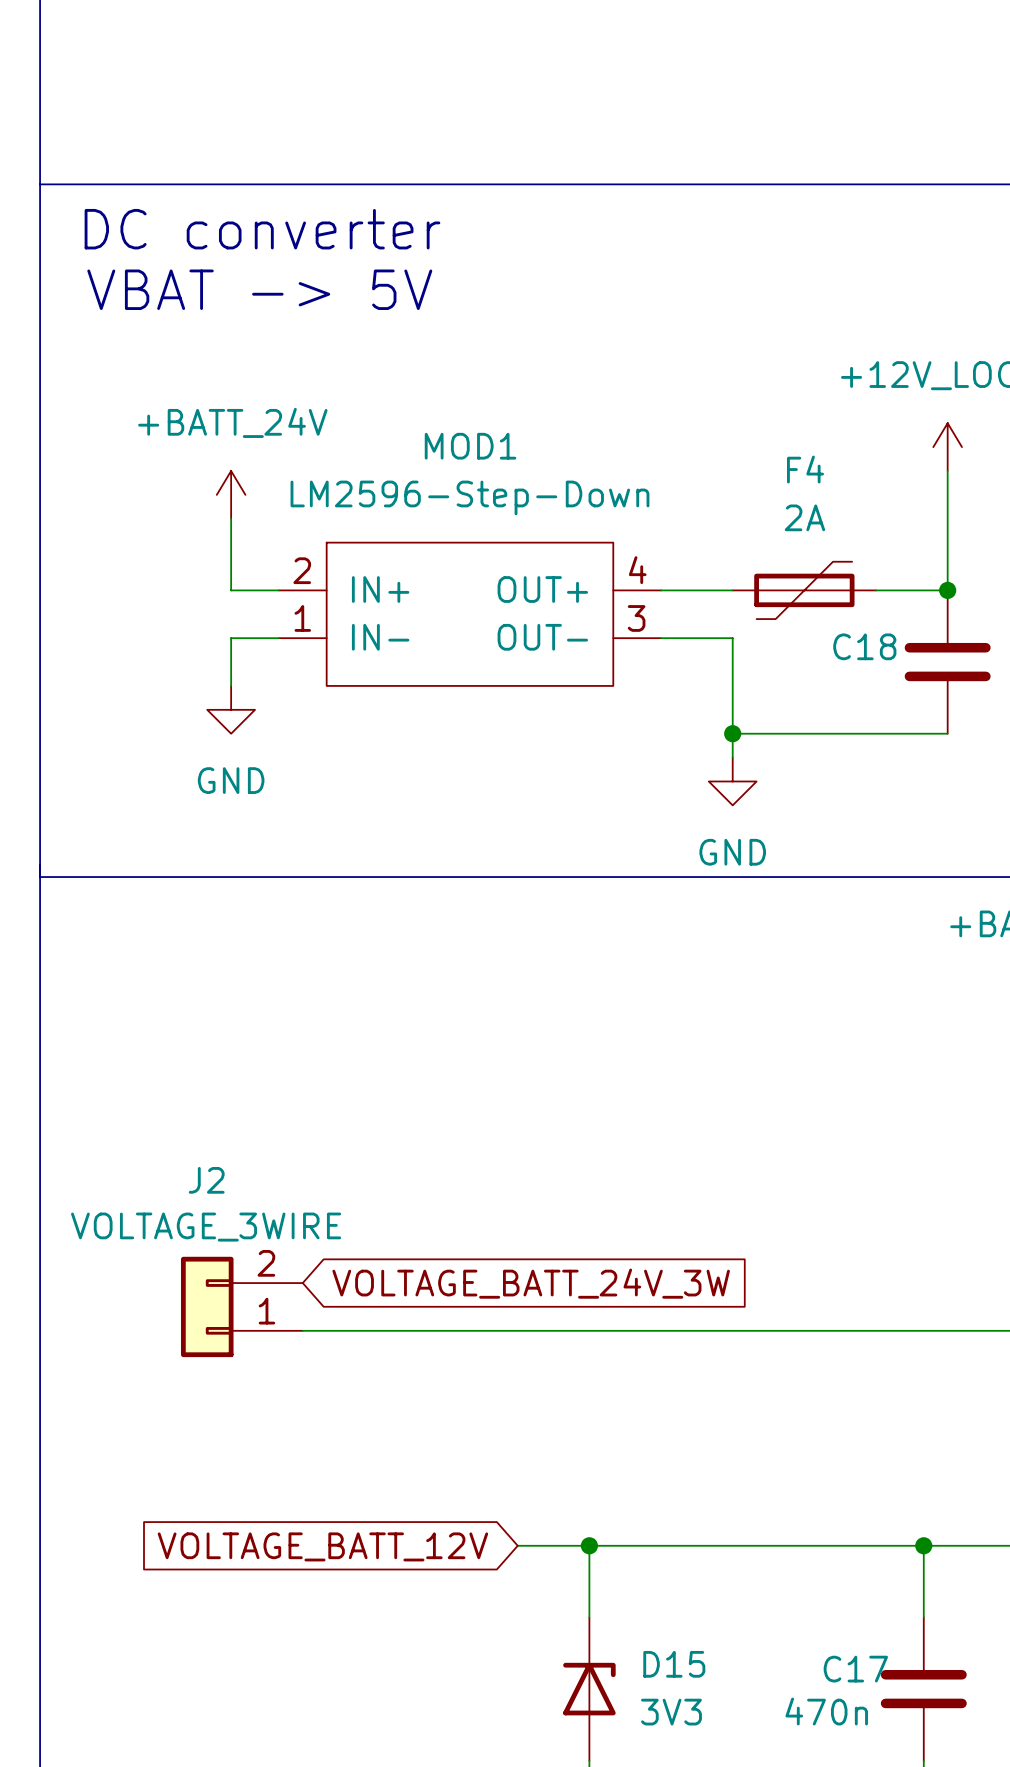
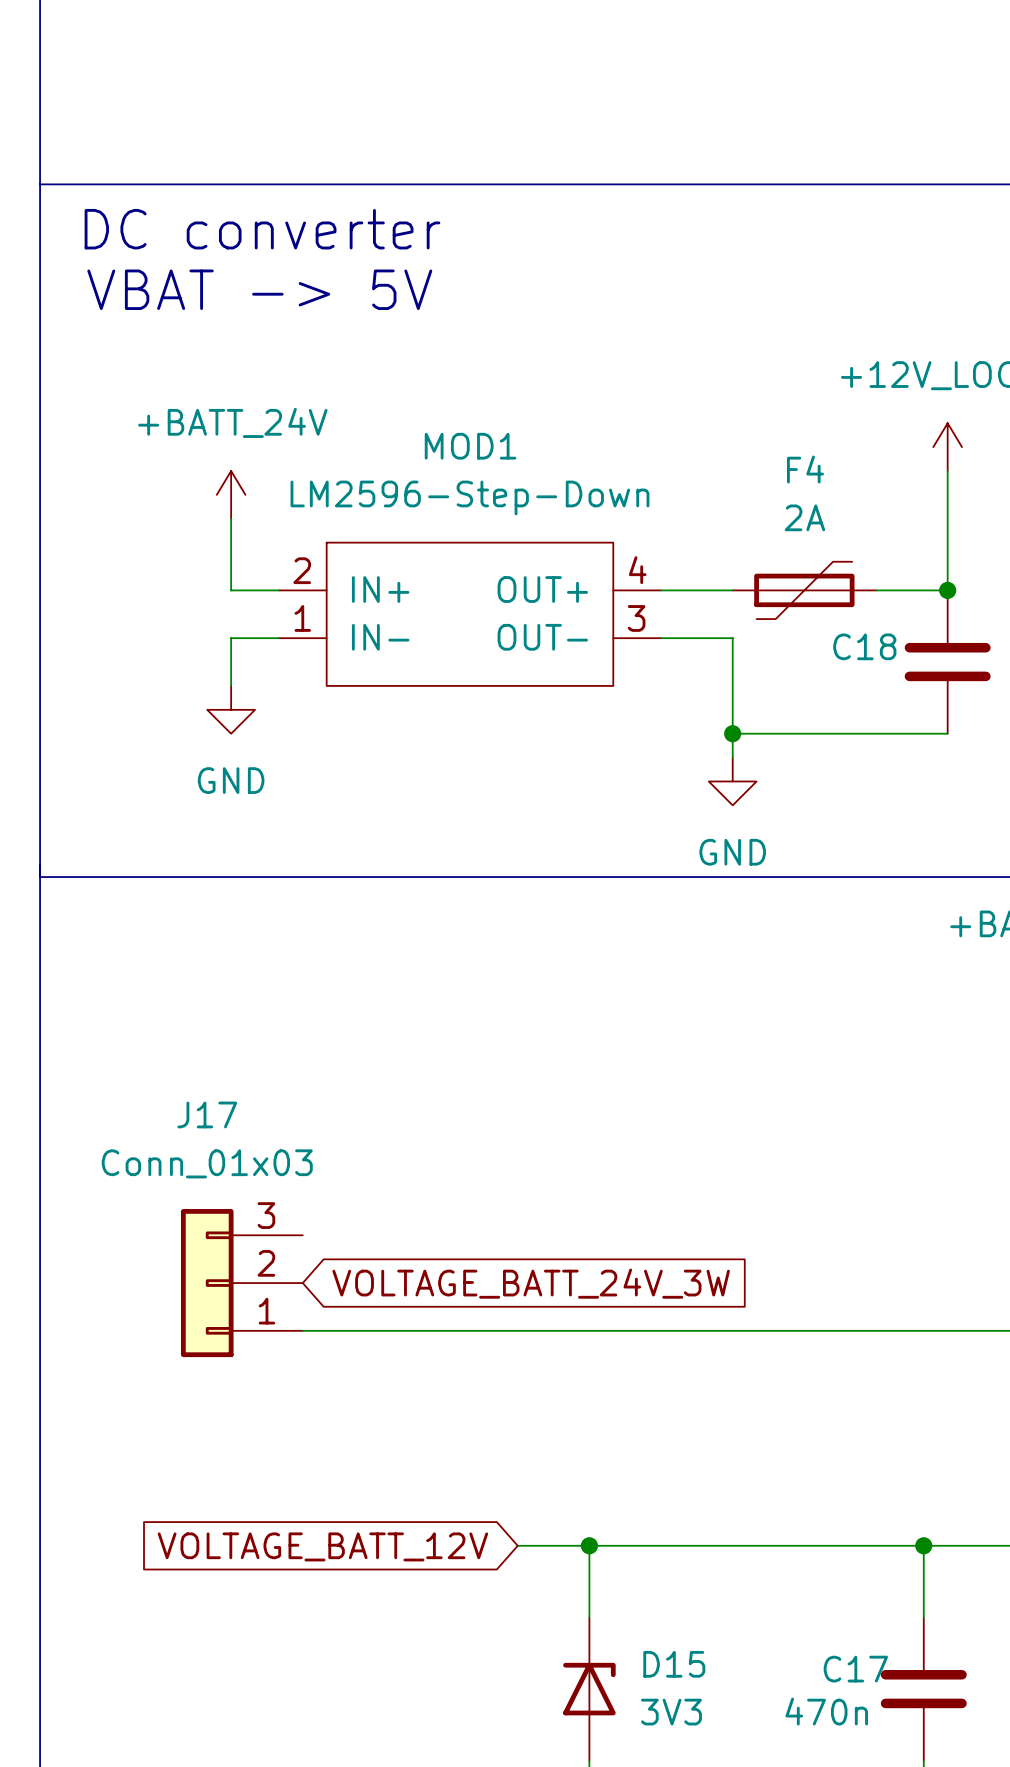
J17: none -> Conn_01x03 (241, 1283)
J2: VOLTAGE_3WIRE (241, 1306) -> none

